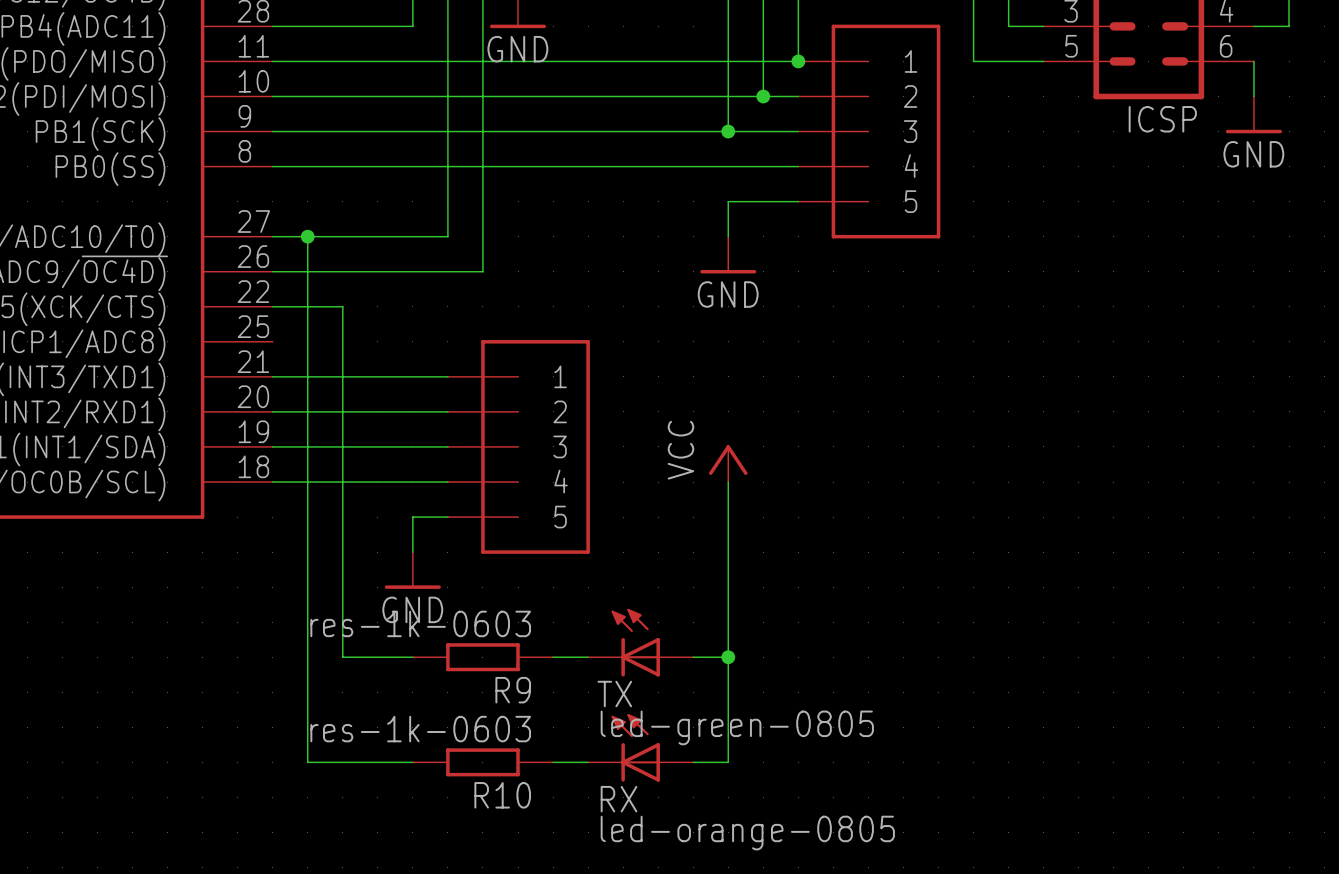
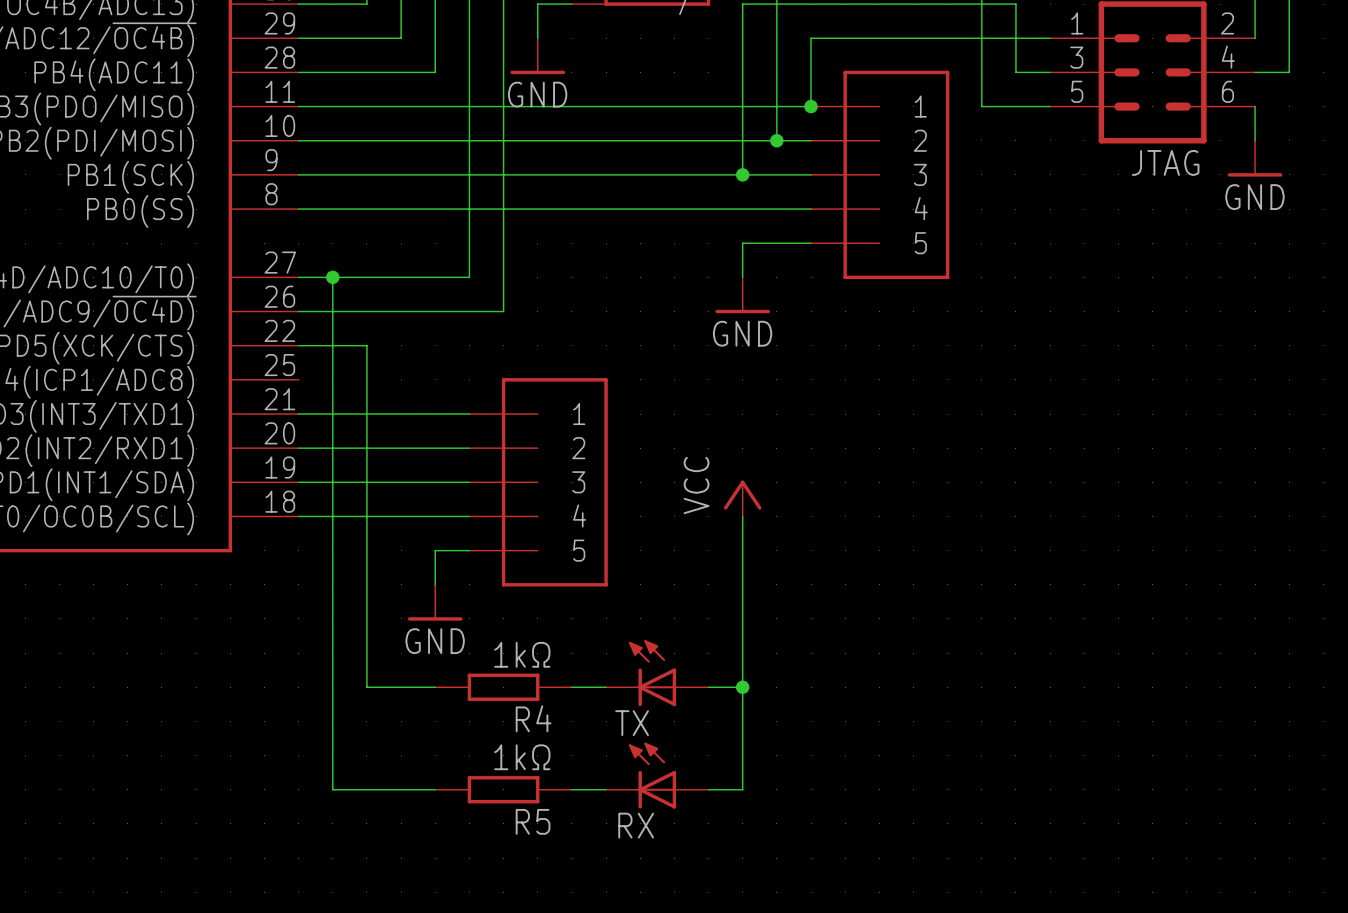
ICSP name: ICSP (1162, 119) -> JTAG (1165, 162)
R9 value: res-1k-0603 (420, 623) -> 1kΩ (522, 654)
R9 name: R9 (513, 690) -> R4 (533, 718)
TX value: led-green-0805 (737, 727) -> none
R10 value: res-1k-0603 (420, 729) -> 1kΩ (522, 757)
R10 name: R10 (502, 795) -> R5 (533, 821)
RX value: led-orange-0805 (747, 833) -> none

